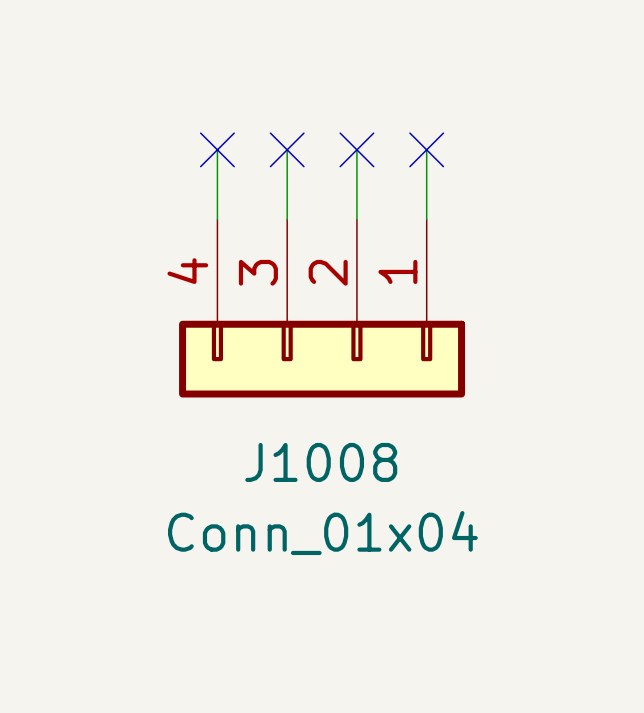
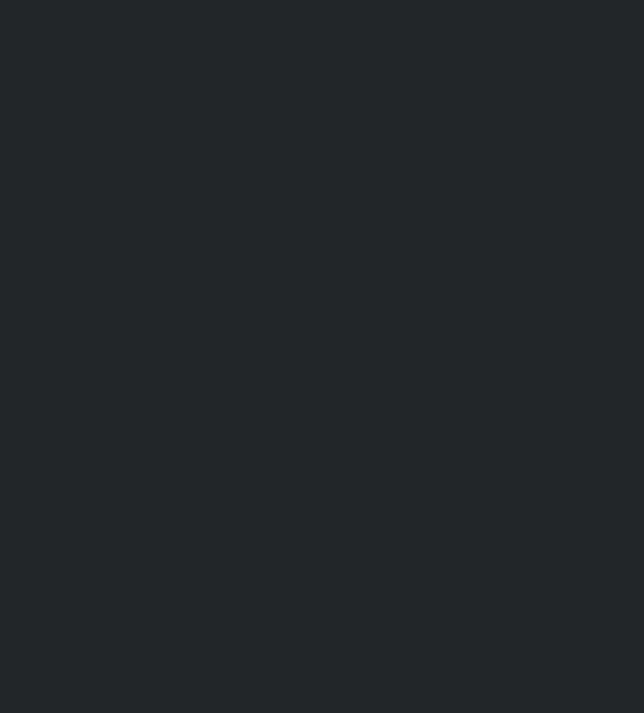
wire: (217, 149) (217, 219) -> none
no-connect mark: (217, 149) -> none
wire: (287, 149) (287, 219) -> none
no-connect mark: (287, 149) -> none
wire: (356, 149) (356, 219) -> none
no-connect mark: (356, 149) -> none
wire: (426, 149) (426, 219) -> none
no-connect mark: (426, 149) -> none
J1008: Conn_01x04 (322, 308) -> none

